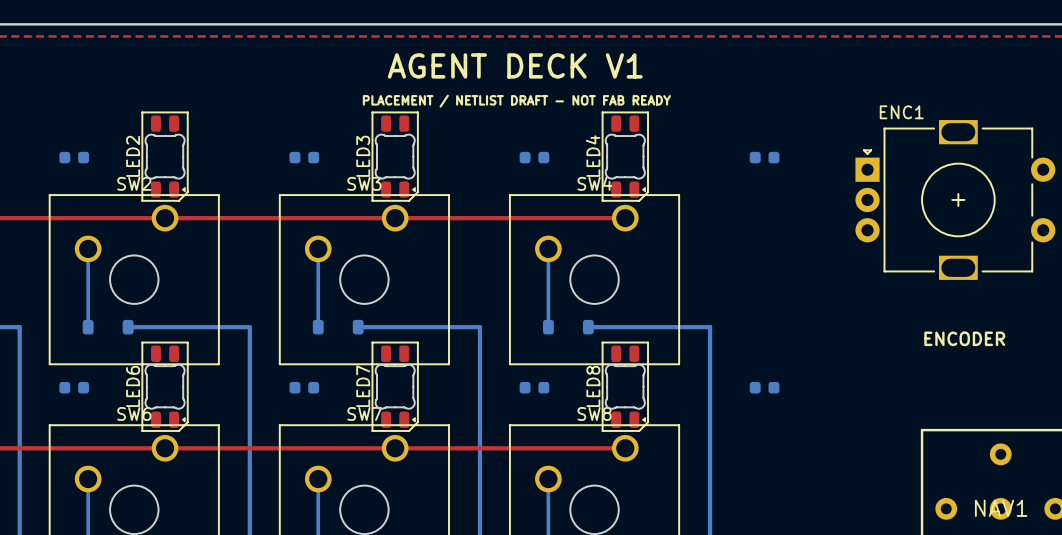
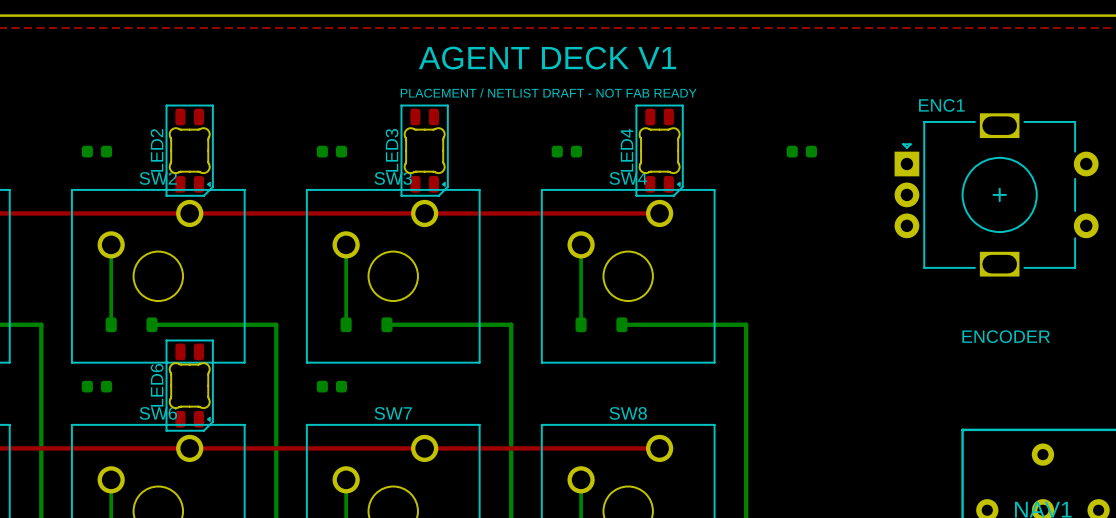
LED7: (395, 386) -> none
LED8: (625, 386) -> none
part: (534, 387) -> none
part: (764, 387) -> none

